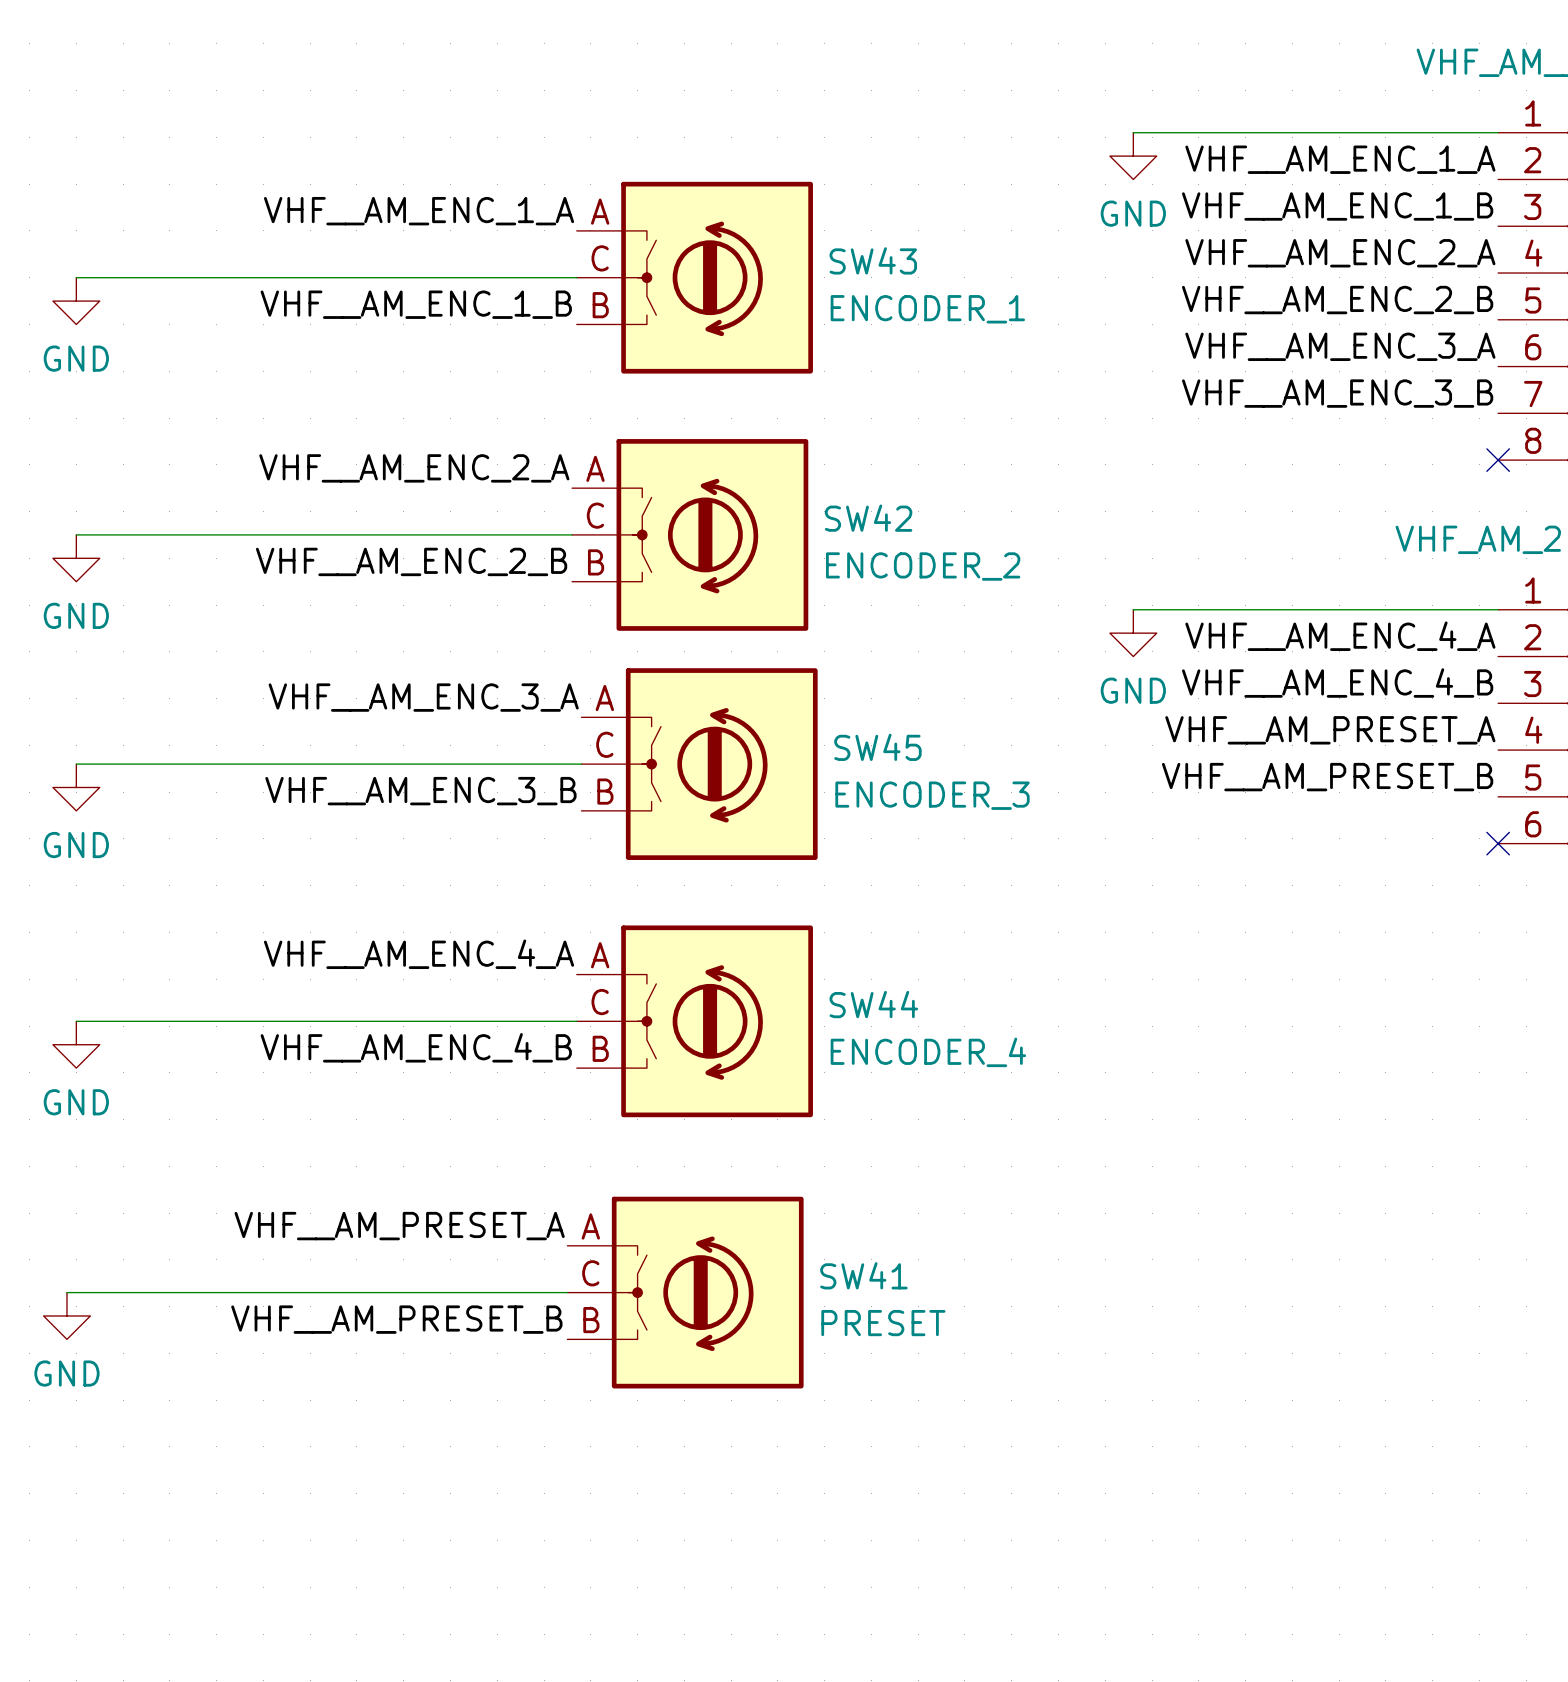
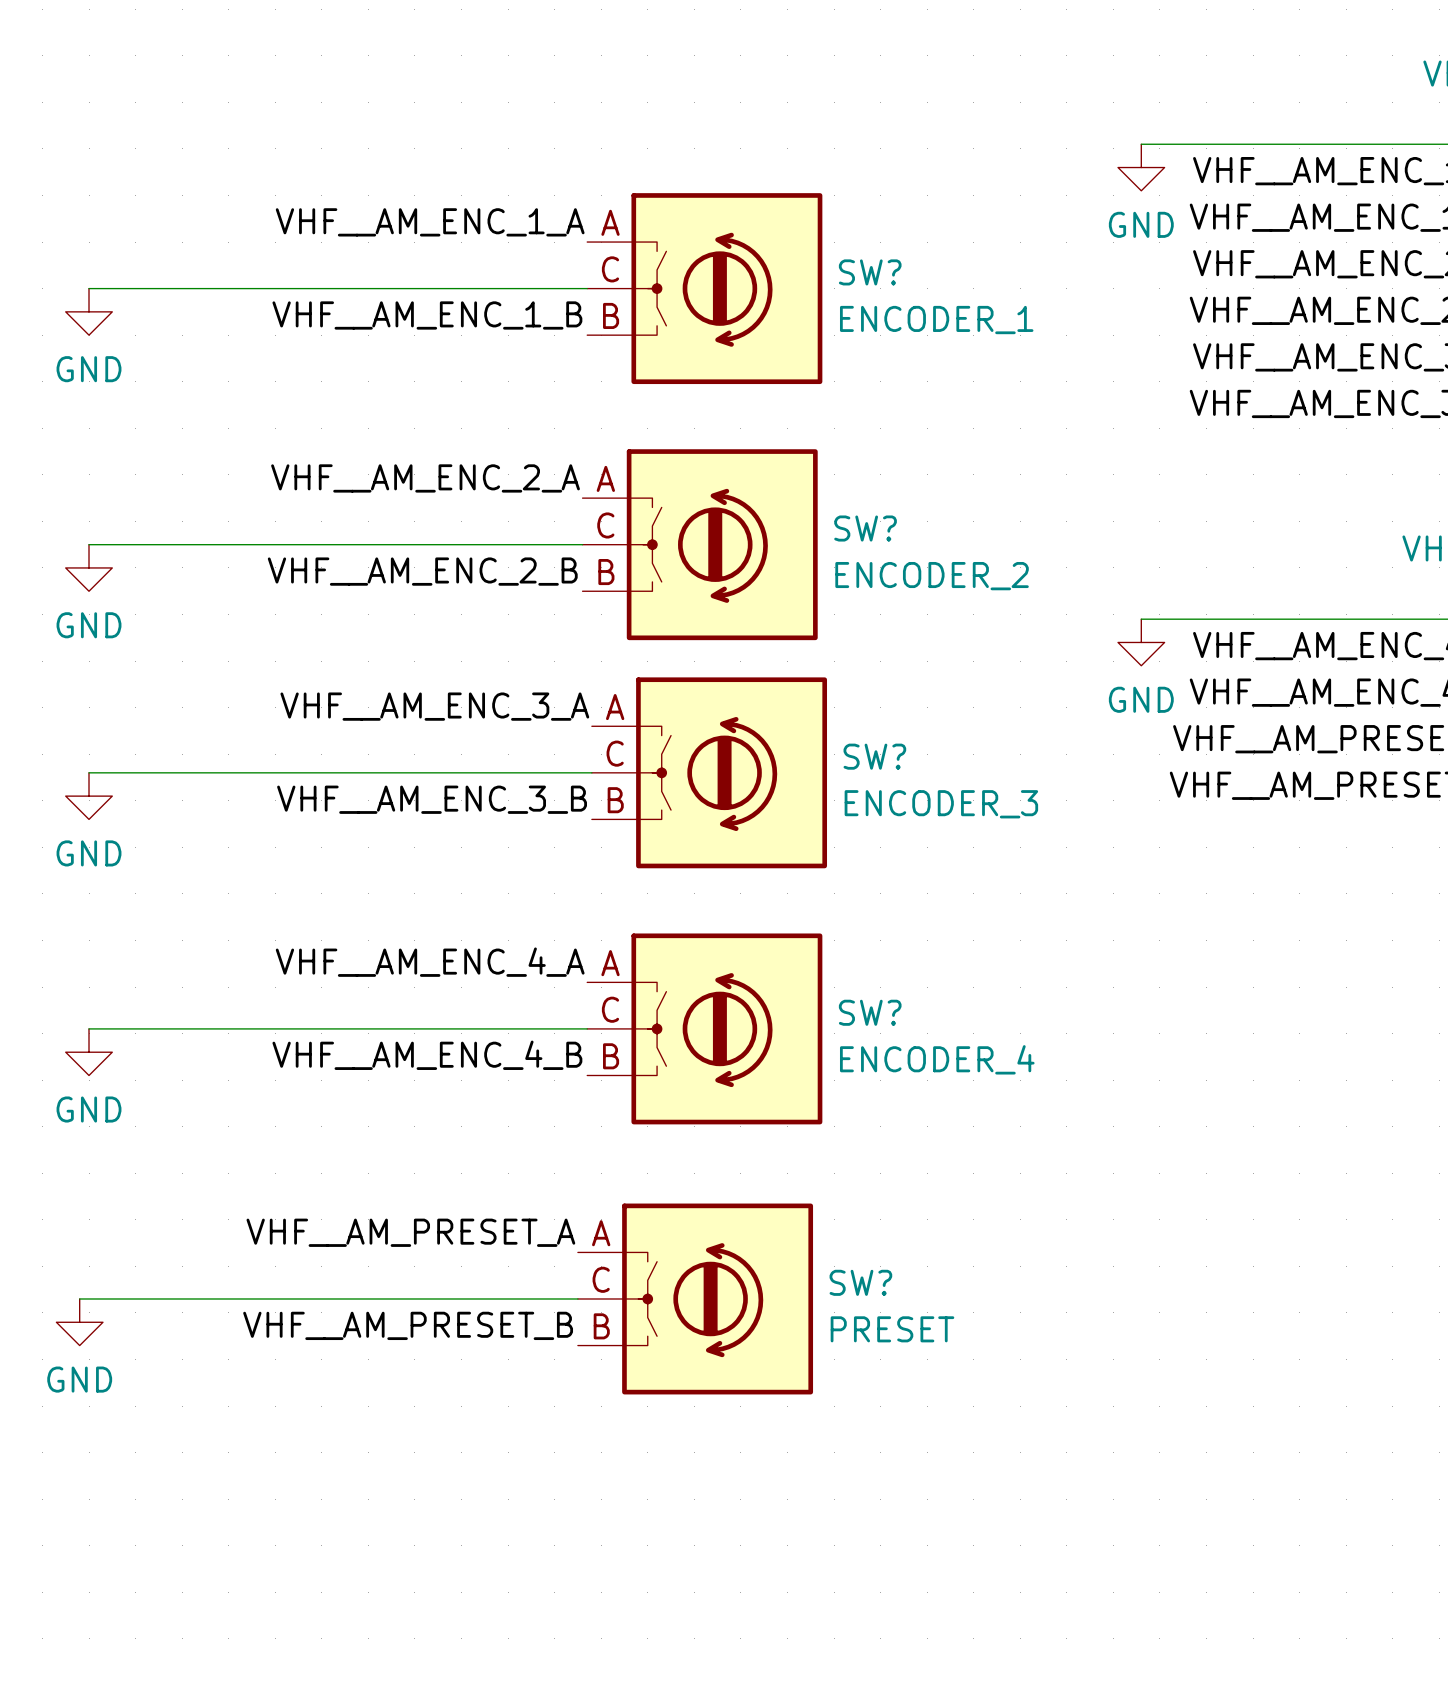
SW43 name: SW43 (873, 260) -> SW? (870, 272)
SW42 name: SW42 (868, 518) -> SW? (865, 528)
SW45 name: SW45 (877, 747) -> SW? (874, 756)
SW44 name: SW44 (873, 1004) -> SW? (870, 1012)
SW41 name: SW41 (863, 1275) -> SW? (860, 1282)

